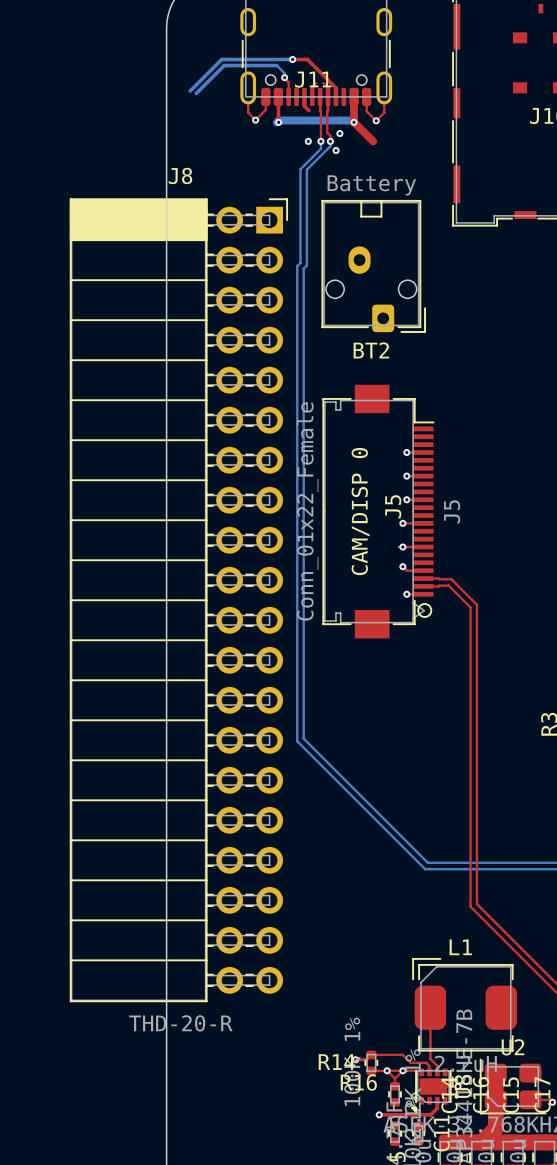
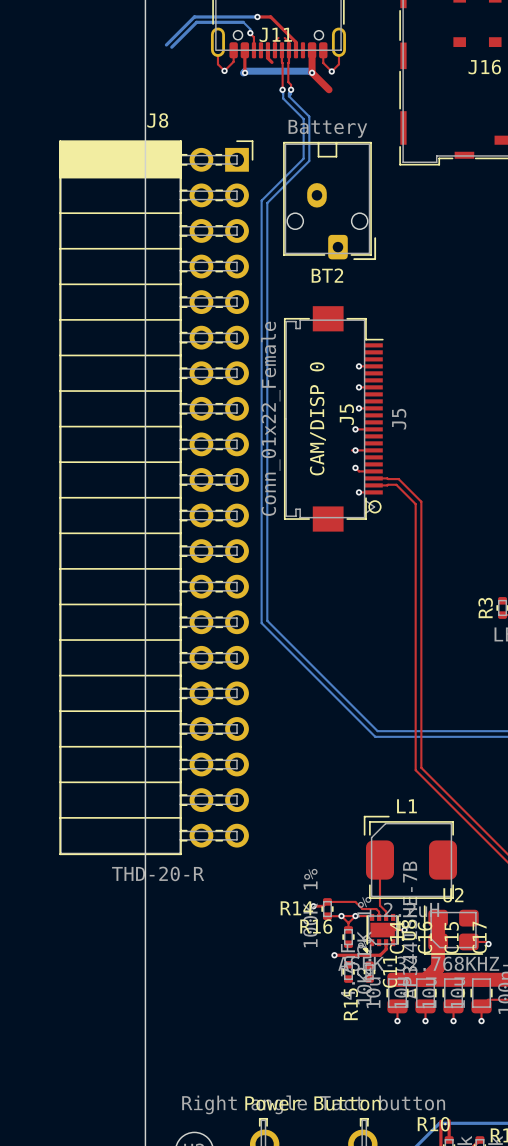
via: (339, 133) -> none
via: (308, 141) -> none
bottom track: (320, 141) (320, 148) (300, 169) (300, 262) -> (280, 90) (283, 93) (283, 98) (303, 118) (303, 158) (264, 197)
bottom track: (327, 148) (306, 169) (306, 265) -> (292, 89) (288, 96) (309, 116) (309, 160) (270, 200)
via: (336, 150) -> none

